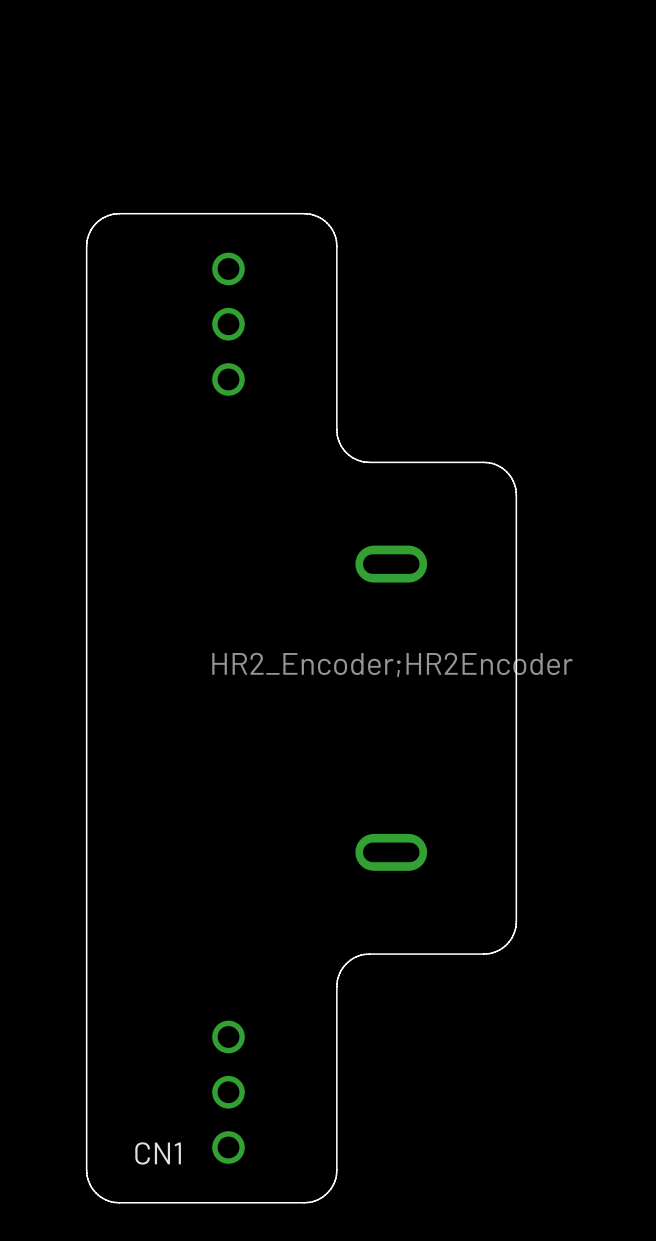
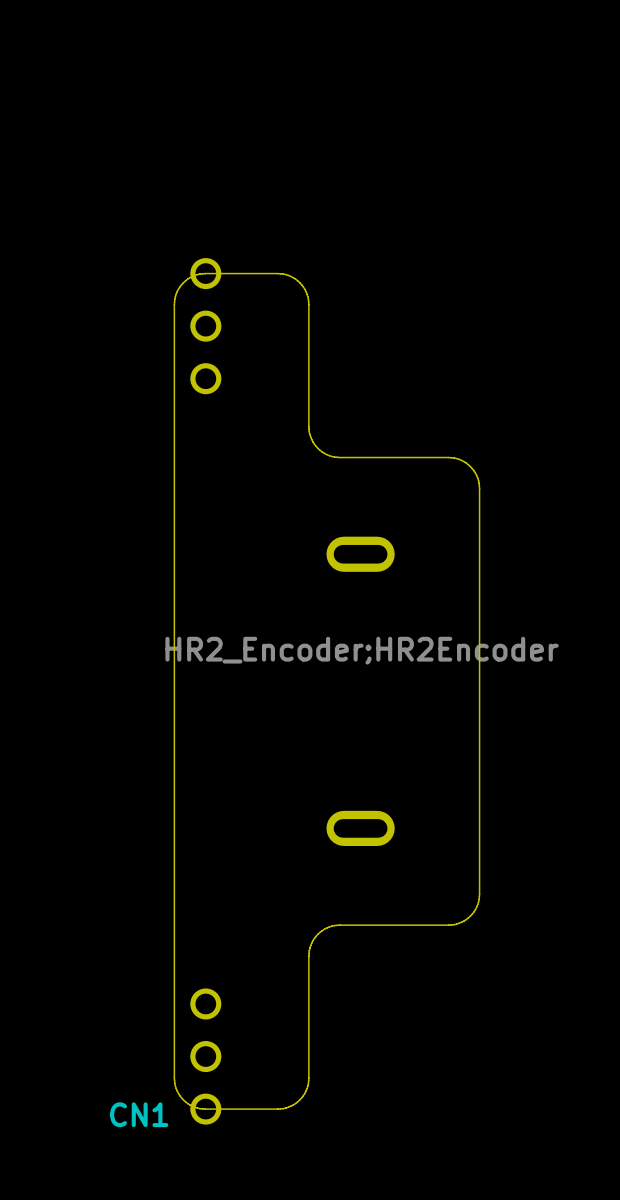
board edge: (336, 301) (335, 237) (327, 223) (312, 214) (113, 214) (96, 223) (87, 237) (87, 1178) (96, 1193) (113, 1202) (312, 1201) (327, 1193) (335, 1178) (336, 1114) -> (308, 304) (307, 294) (299, 282) (288, 275) (277, 273) (197, 274) (187, 279) (179, 286) (174, 304) (174, 1083) (183, 1099) (197, 1108) (277, 1109) (288, 1107) (299, 1099) (307, 1088) (308, 1078)

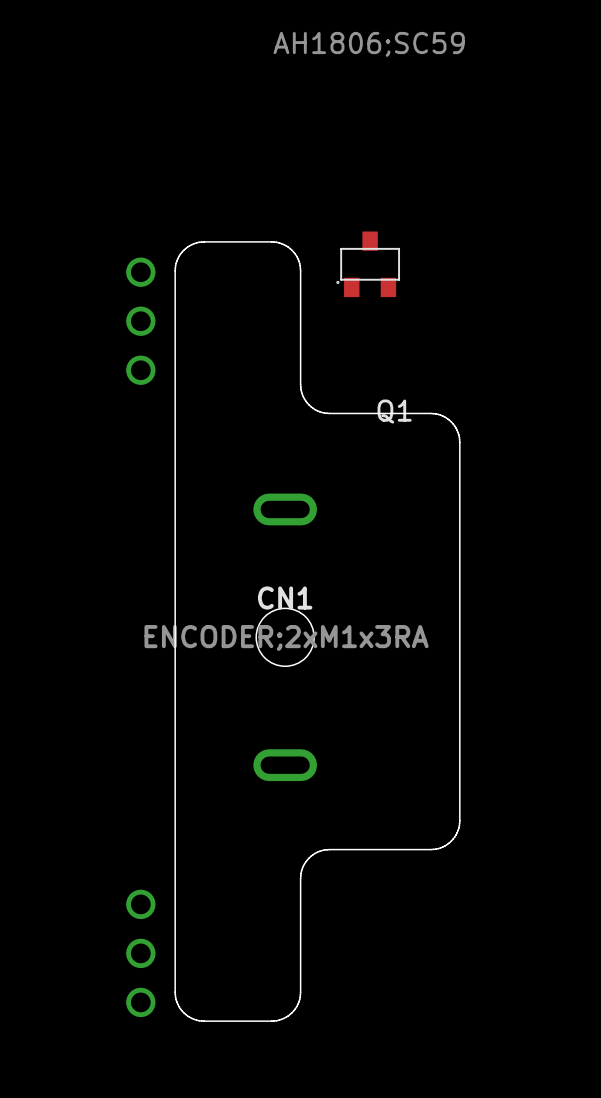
CN1 footprint: [190, 258, 395, 1125] -> [126, 257, 318, 1018]
Q1: none -> AH1806;SC59 (368, 264)
CN1 value: HR2_Encoder;HR2Encoder (362, 650) -> ENCODER;2xM1x3RA (286, 637)
CN1 name position: CN1 (139, 1114) -> CN1 (285, 598)

